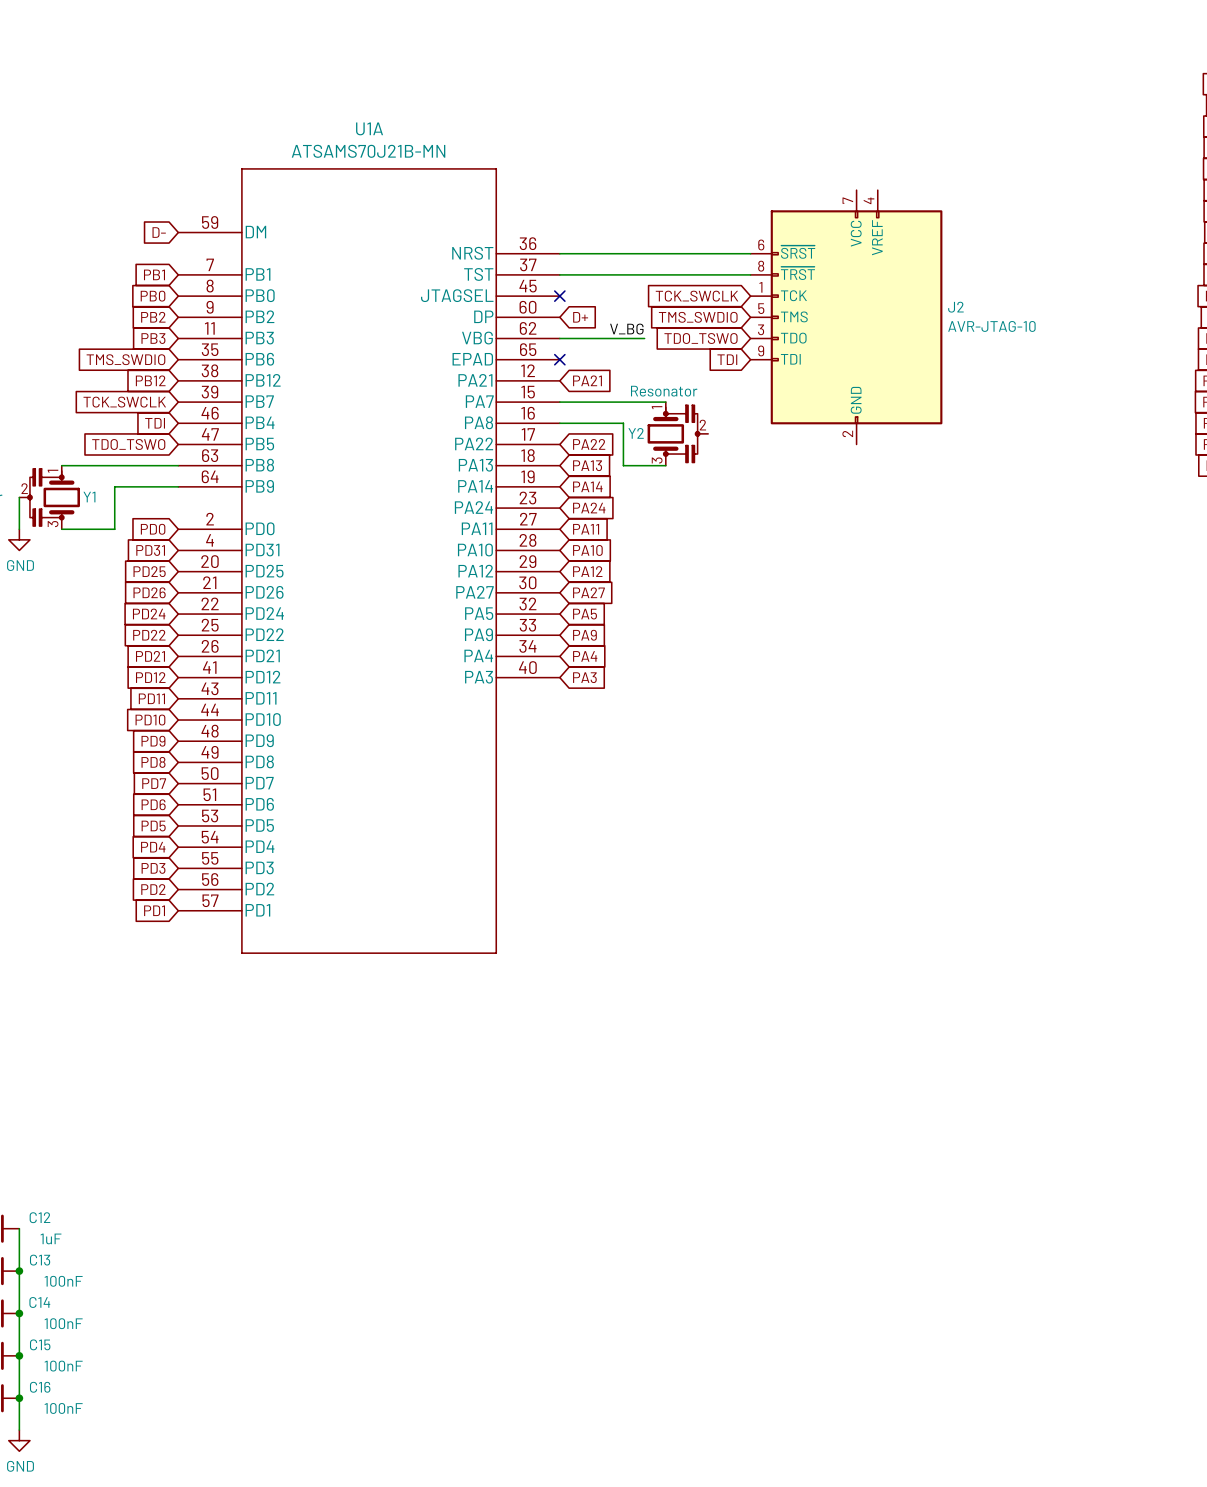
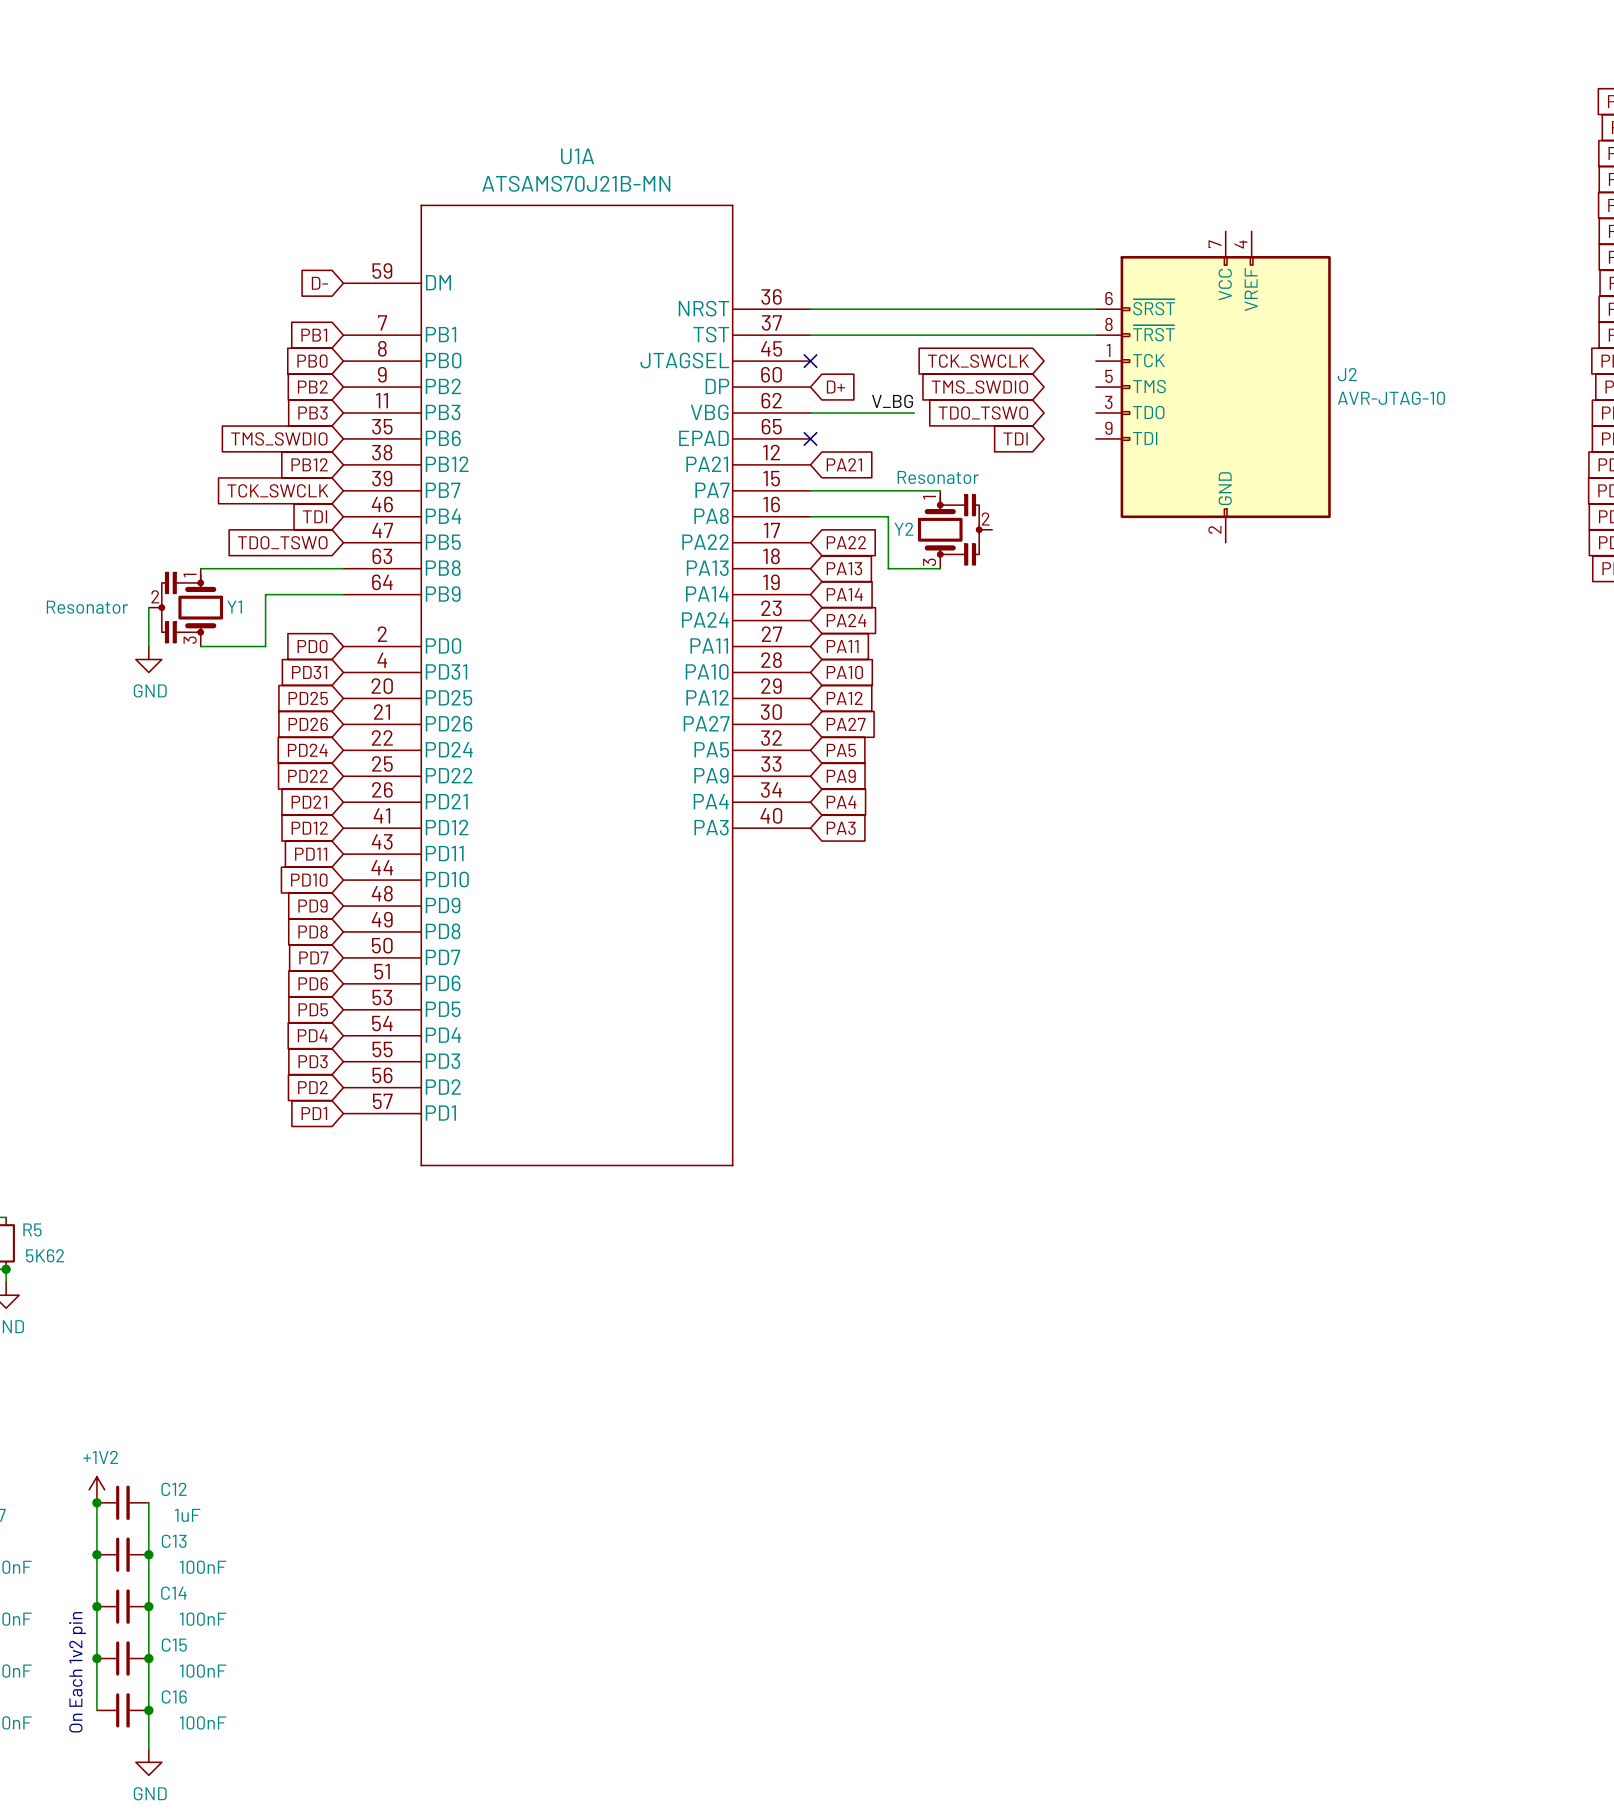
J2 position: (846, 317) -> (1213, 387)

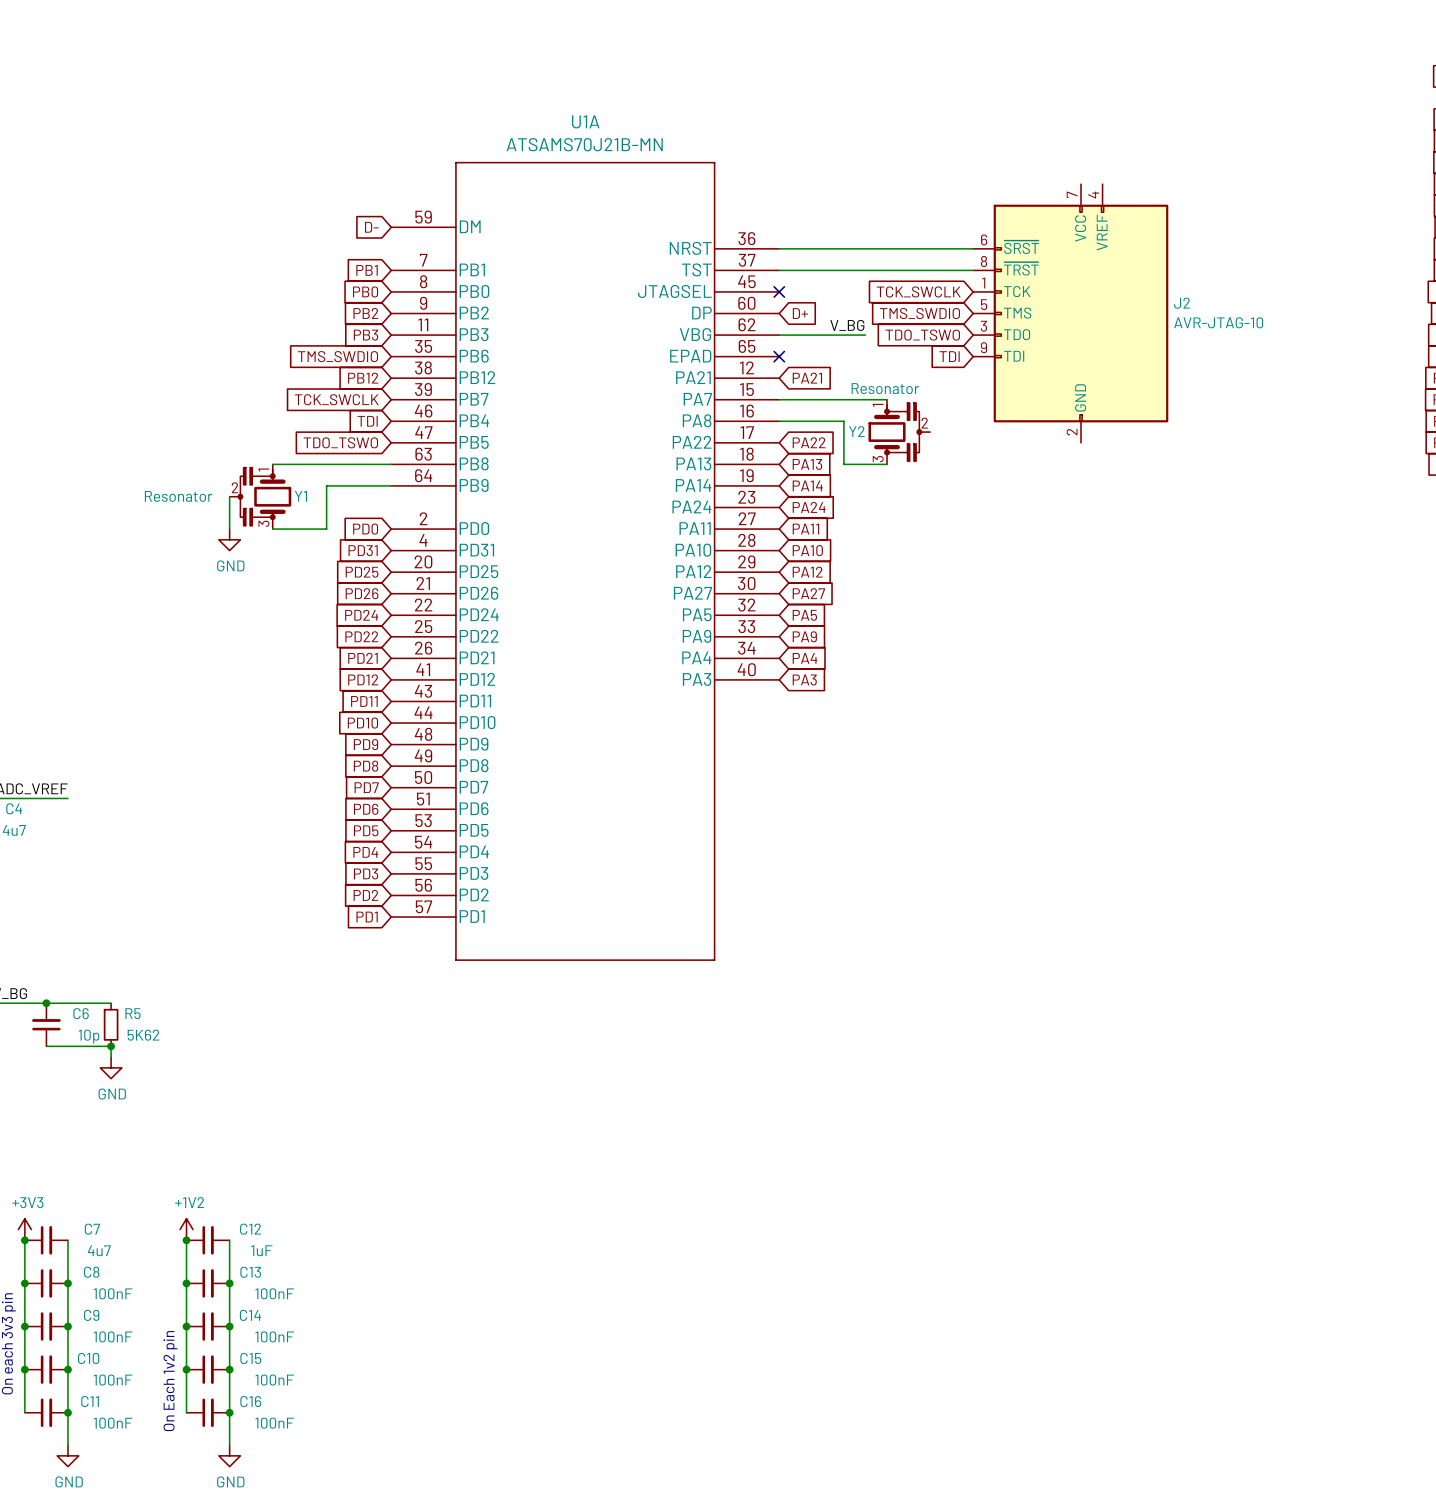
J2 position: (1213, 387) -> (1070, 313)

